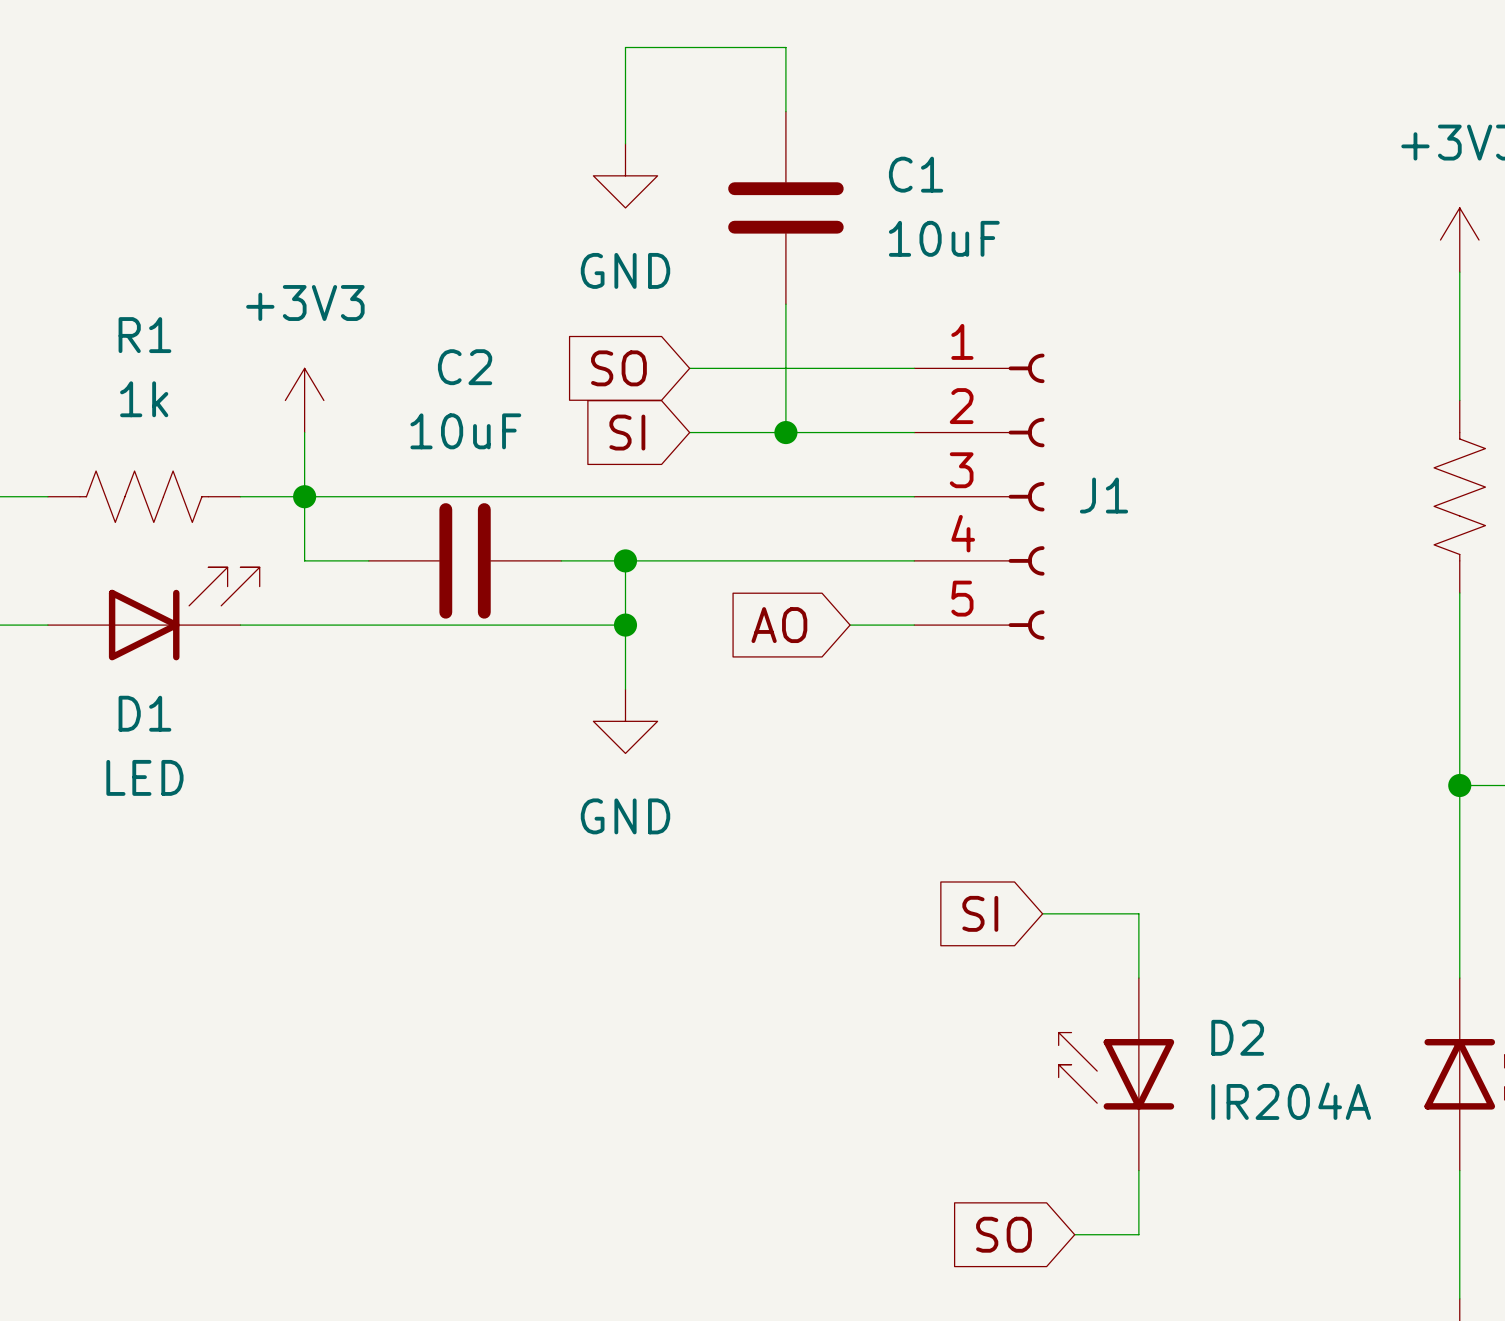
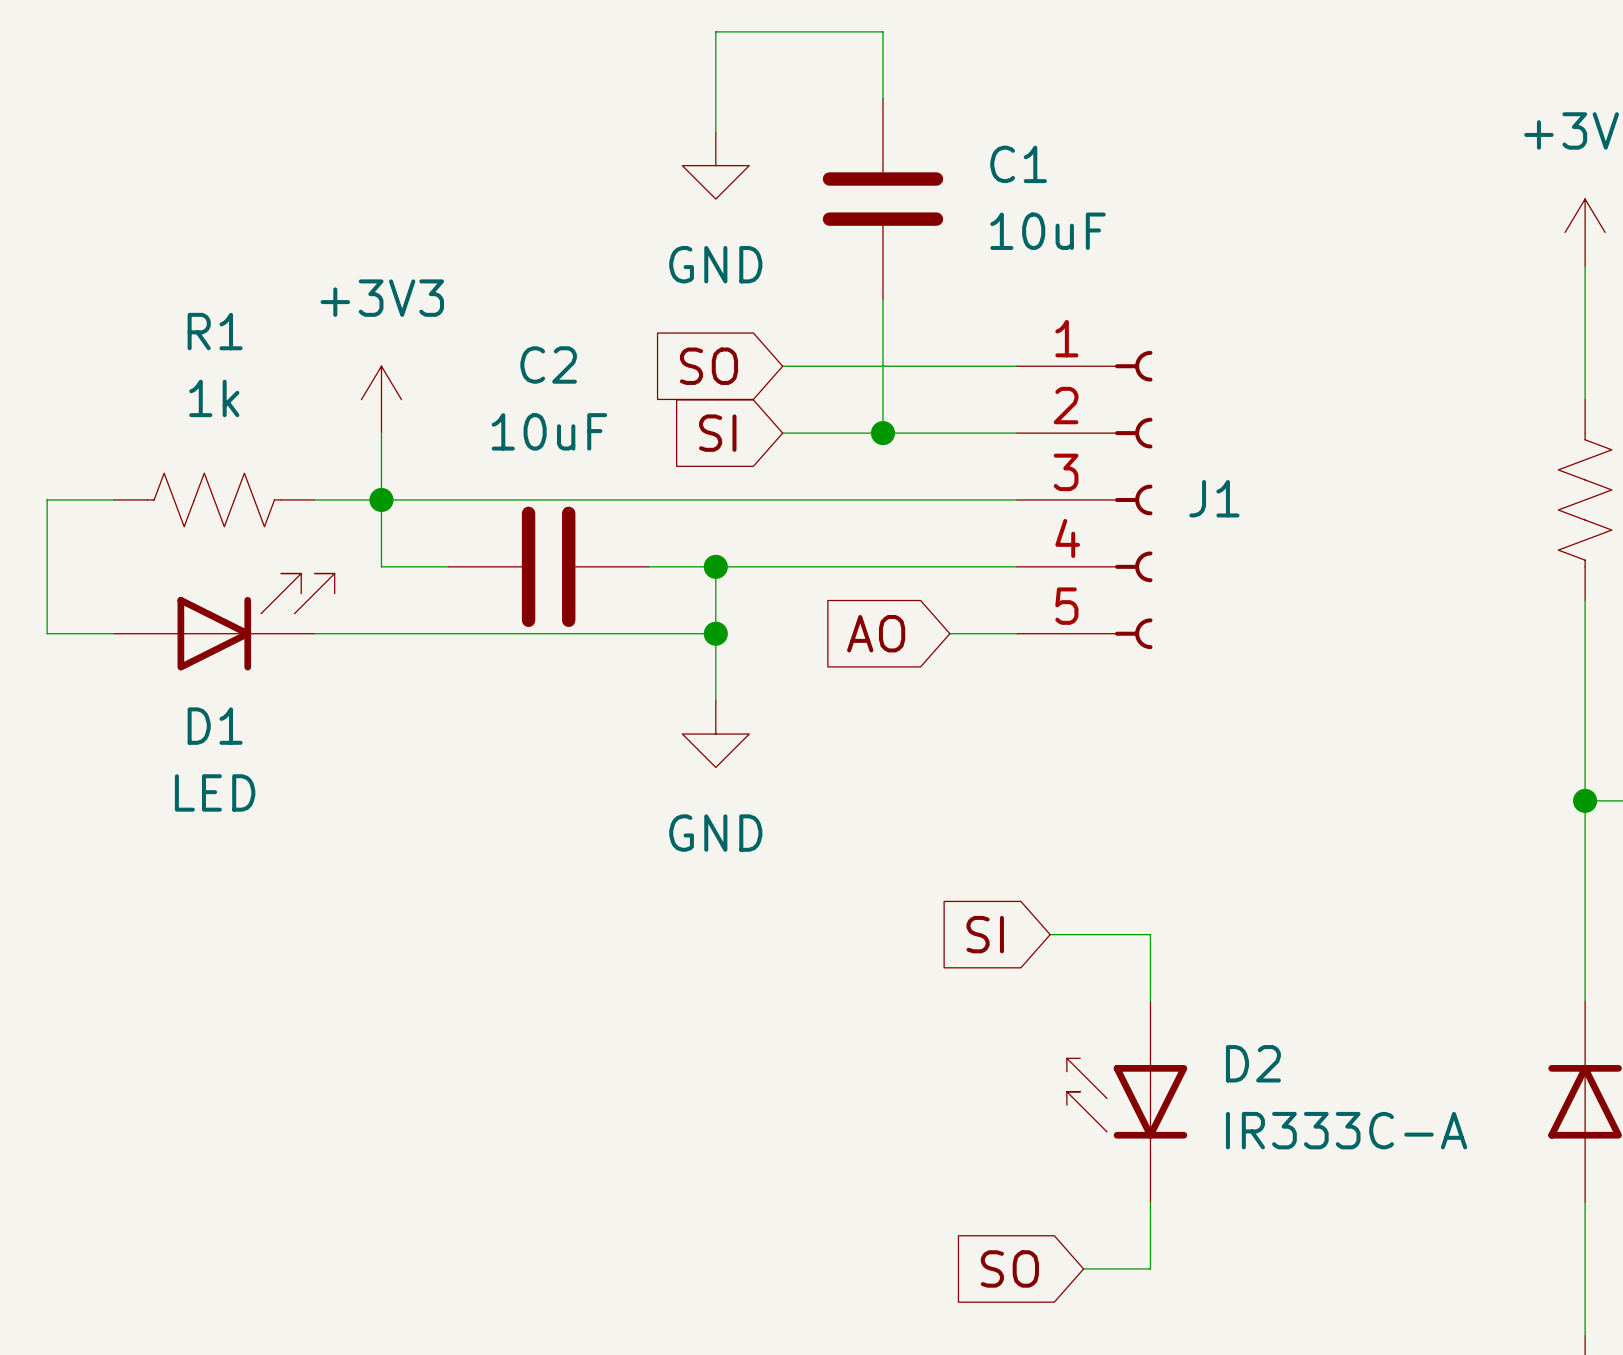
global label position: SI (980, 913) -> SI (985, 934)
wire: (1042, 913) (1138, 913) (1138, 978) -> (1050, 934) (1150, 934) (1150, 1001)
D2 position: (1116, 1074) -> (1127, 1101)
D2 value: IR204A (1291, 1101) -> IR333C-A (1346, 1130)
wire: (1138, 1170) (1138, 1234) (1074, 1234) -> (1150, 1202) (1150, 1268) (1083, 1268)
global label position: SO (1004, 1234) -> SO (1009, 1268)

